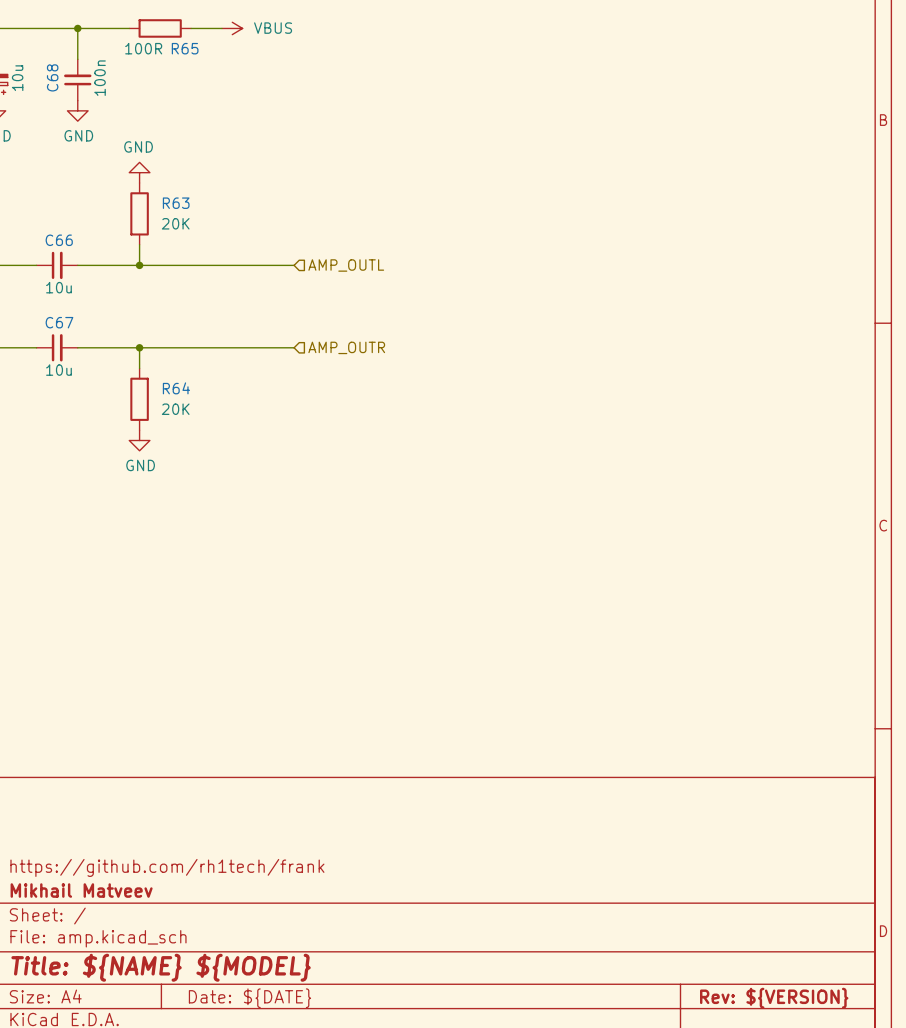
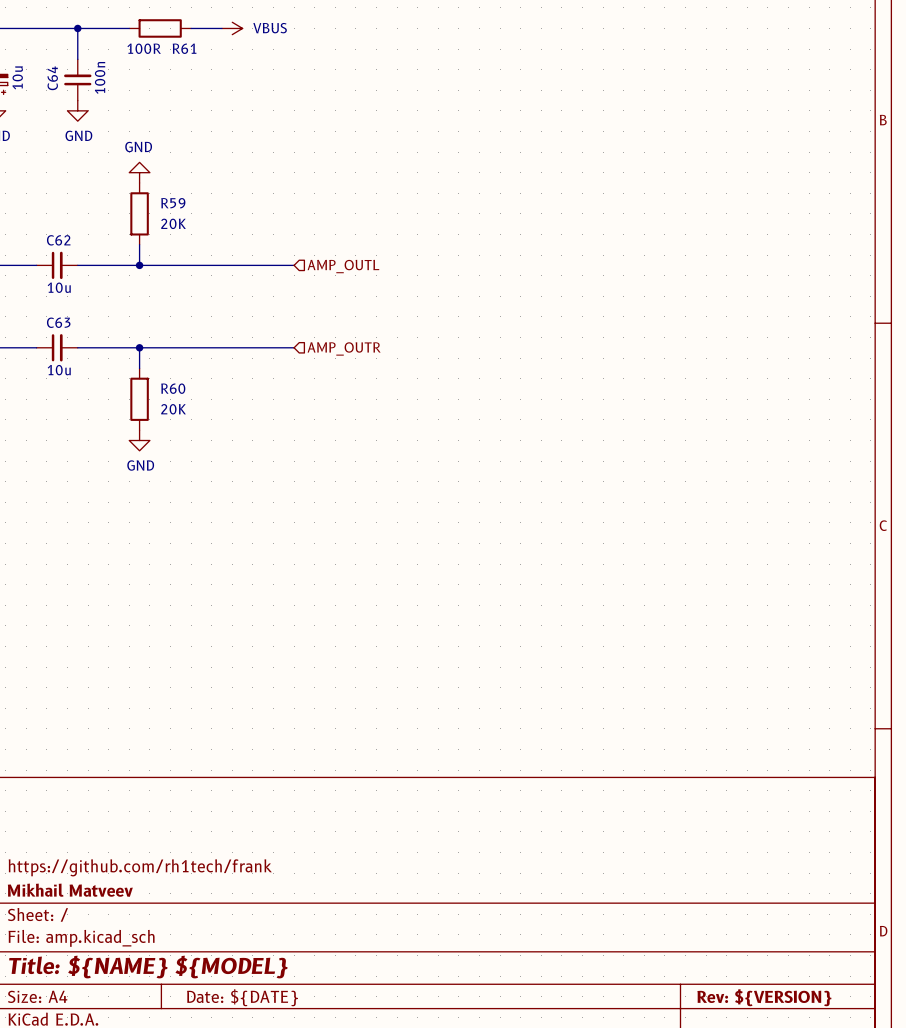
R65 name: R65 (185, 48) -> R61 (184, 48)
C68 name: C68 (52, 77) -> C64 (52, 78)
R63 name: R63 (176, 203) -> R59 (173, 203)
C66 name: C66 (59, 240) -> C62 (58, 240)
C67 name: C67 (59, 322) -> C63 (58, 322)
R64 name: R64 (176, 388) -> R60 (173, 388)

